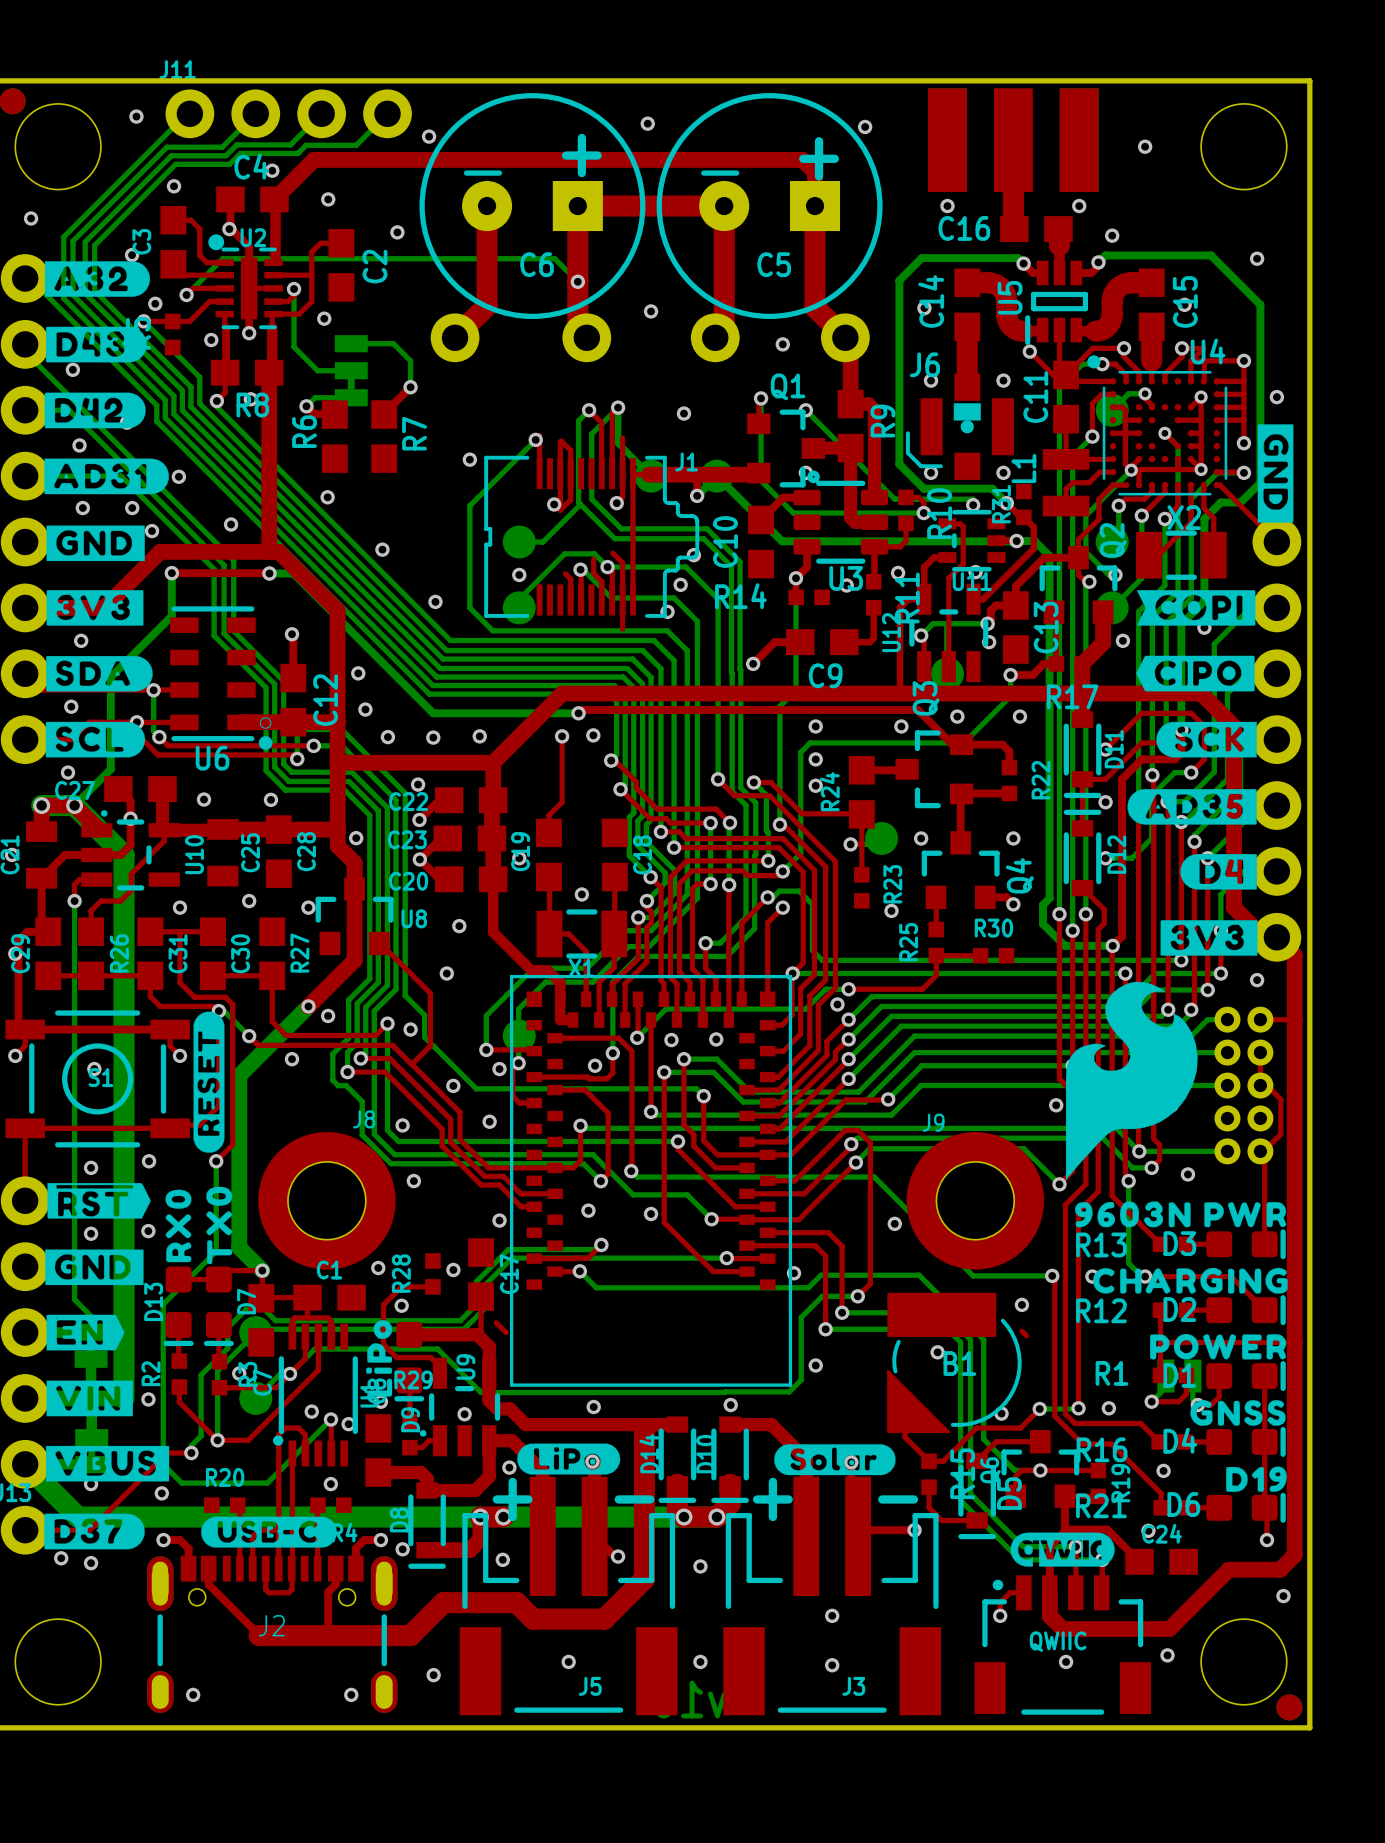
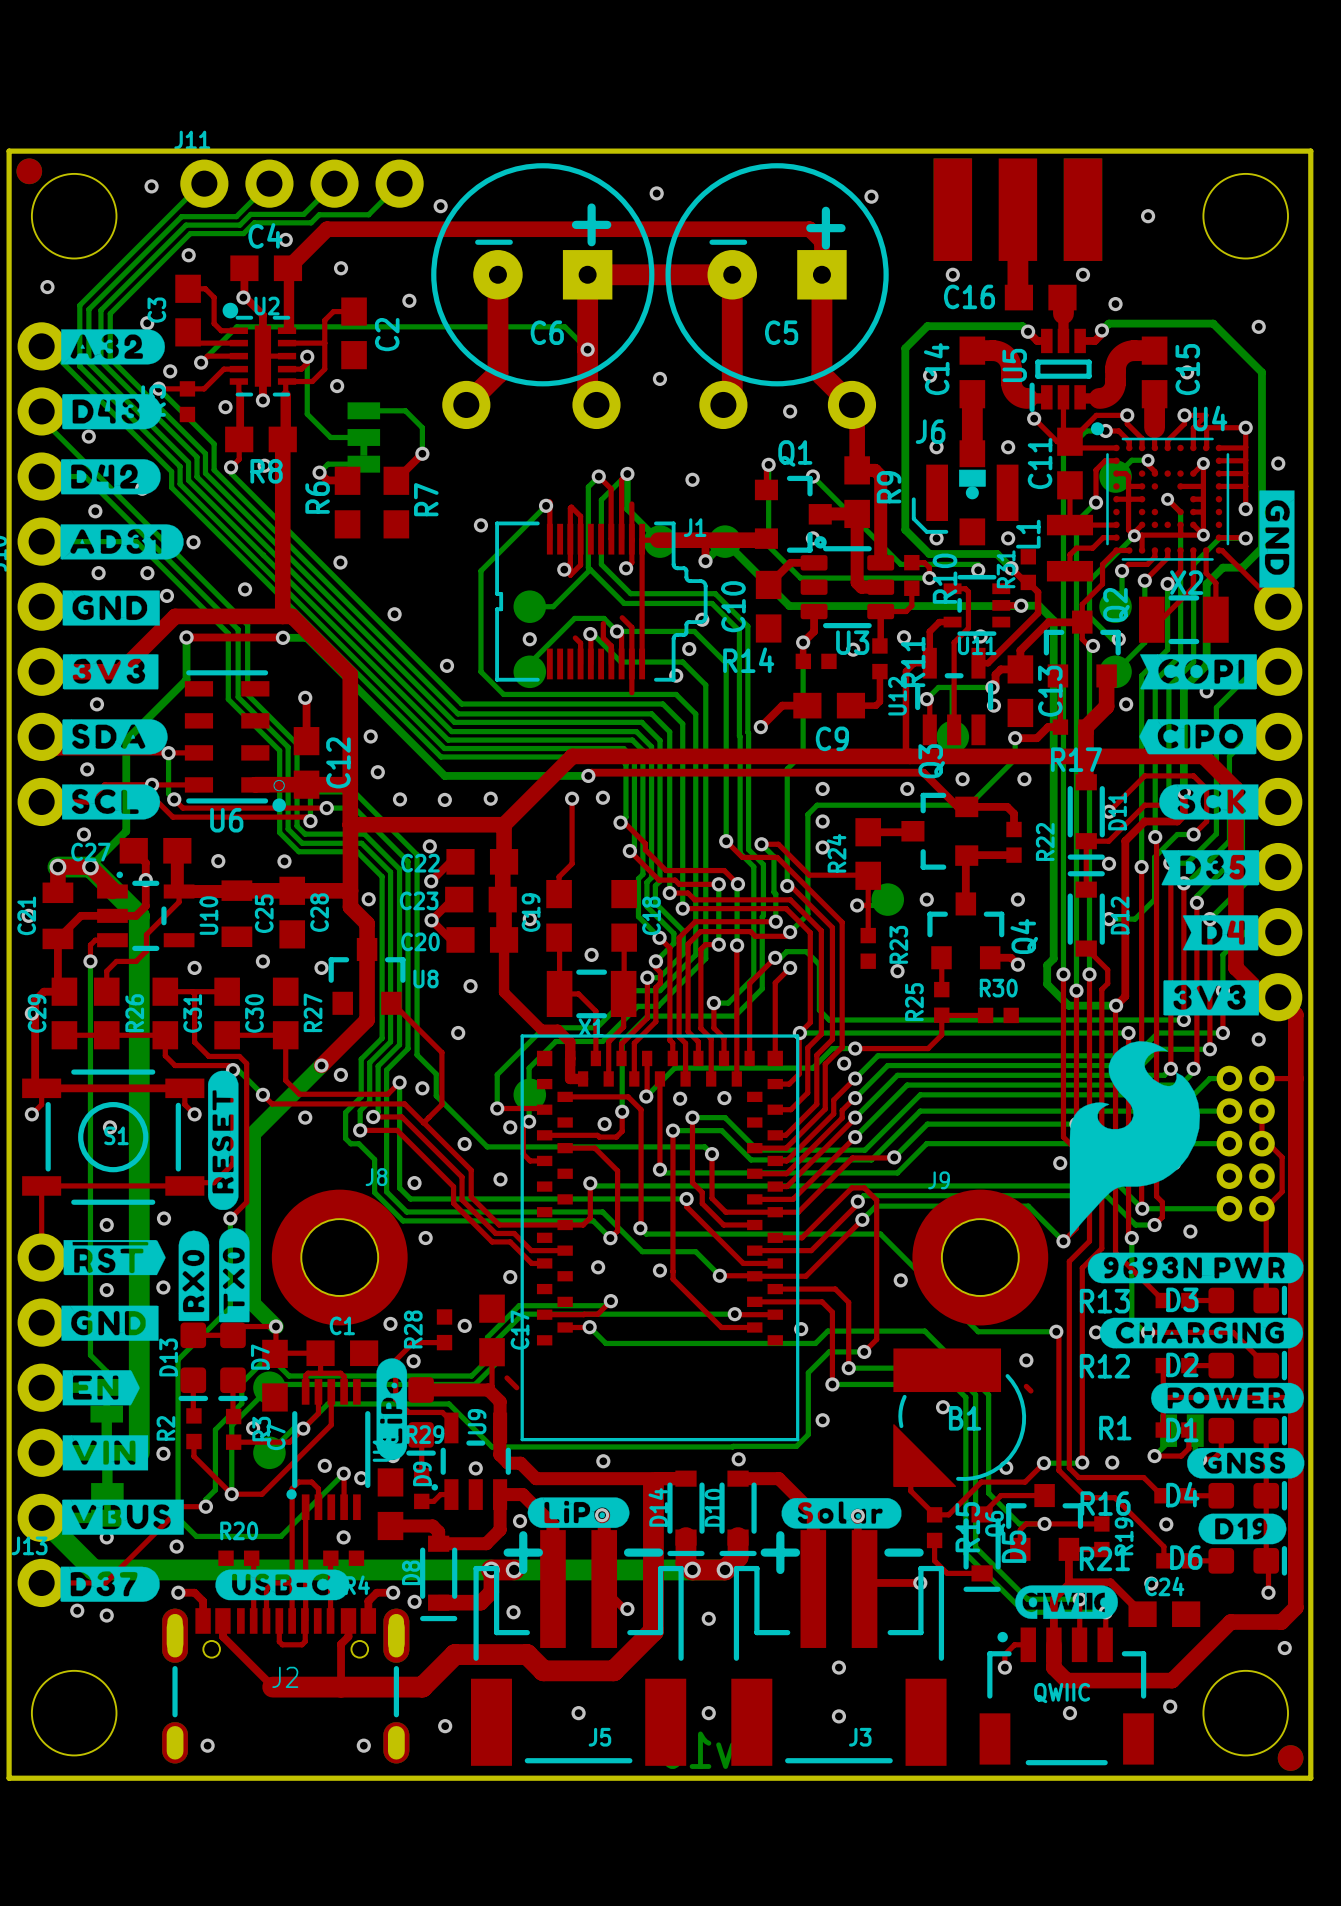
drawing shape: [1127, 789, 1257, 825] -> [1161, 850, 1260, 886]
drawing shape: [1180, 854, 1257, 890] -> [1182, 915, 1259, 951]
drawing shape: [206, 1186, 233, 1265] -> [219, 1228, 250, 1323]
drawing shape: [165, 1189, 192, 1263] -> [178, 1230, 210, 1322]
drawing shape: [1075, 1201, 1287, 1228] -> [1087, 1252, 1304, 1284]
drawing shape: [1093, 1267, 1288, 1294] -> [1099, 1317, 1304, 1349]
drawing shape: [365, 1320, 393, 1397] -> [376, 1358, 408, 1461]
drawing shape: [1149, 1333, 1287, 1360] -> [1150, 1382, 1304, 1414]
drawing shape: [1190, 1400, 1286, 1426] -> [1187, 1447, 1305, 1479]
drawing shape: [1226, 1466, 1287, 1492] -> [1198, 1513, 1287, 1545]

